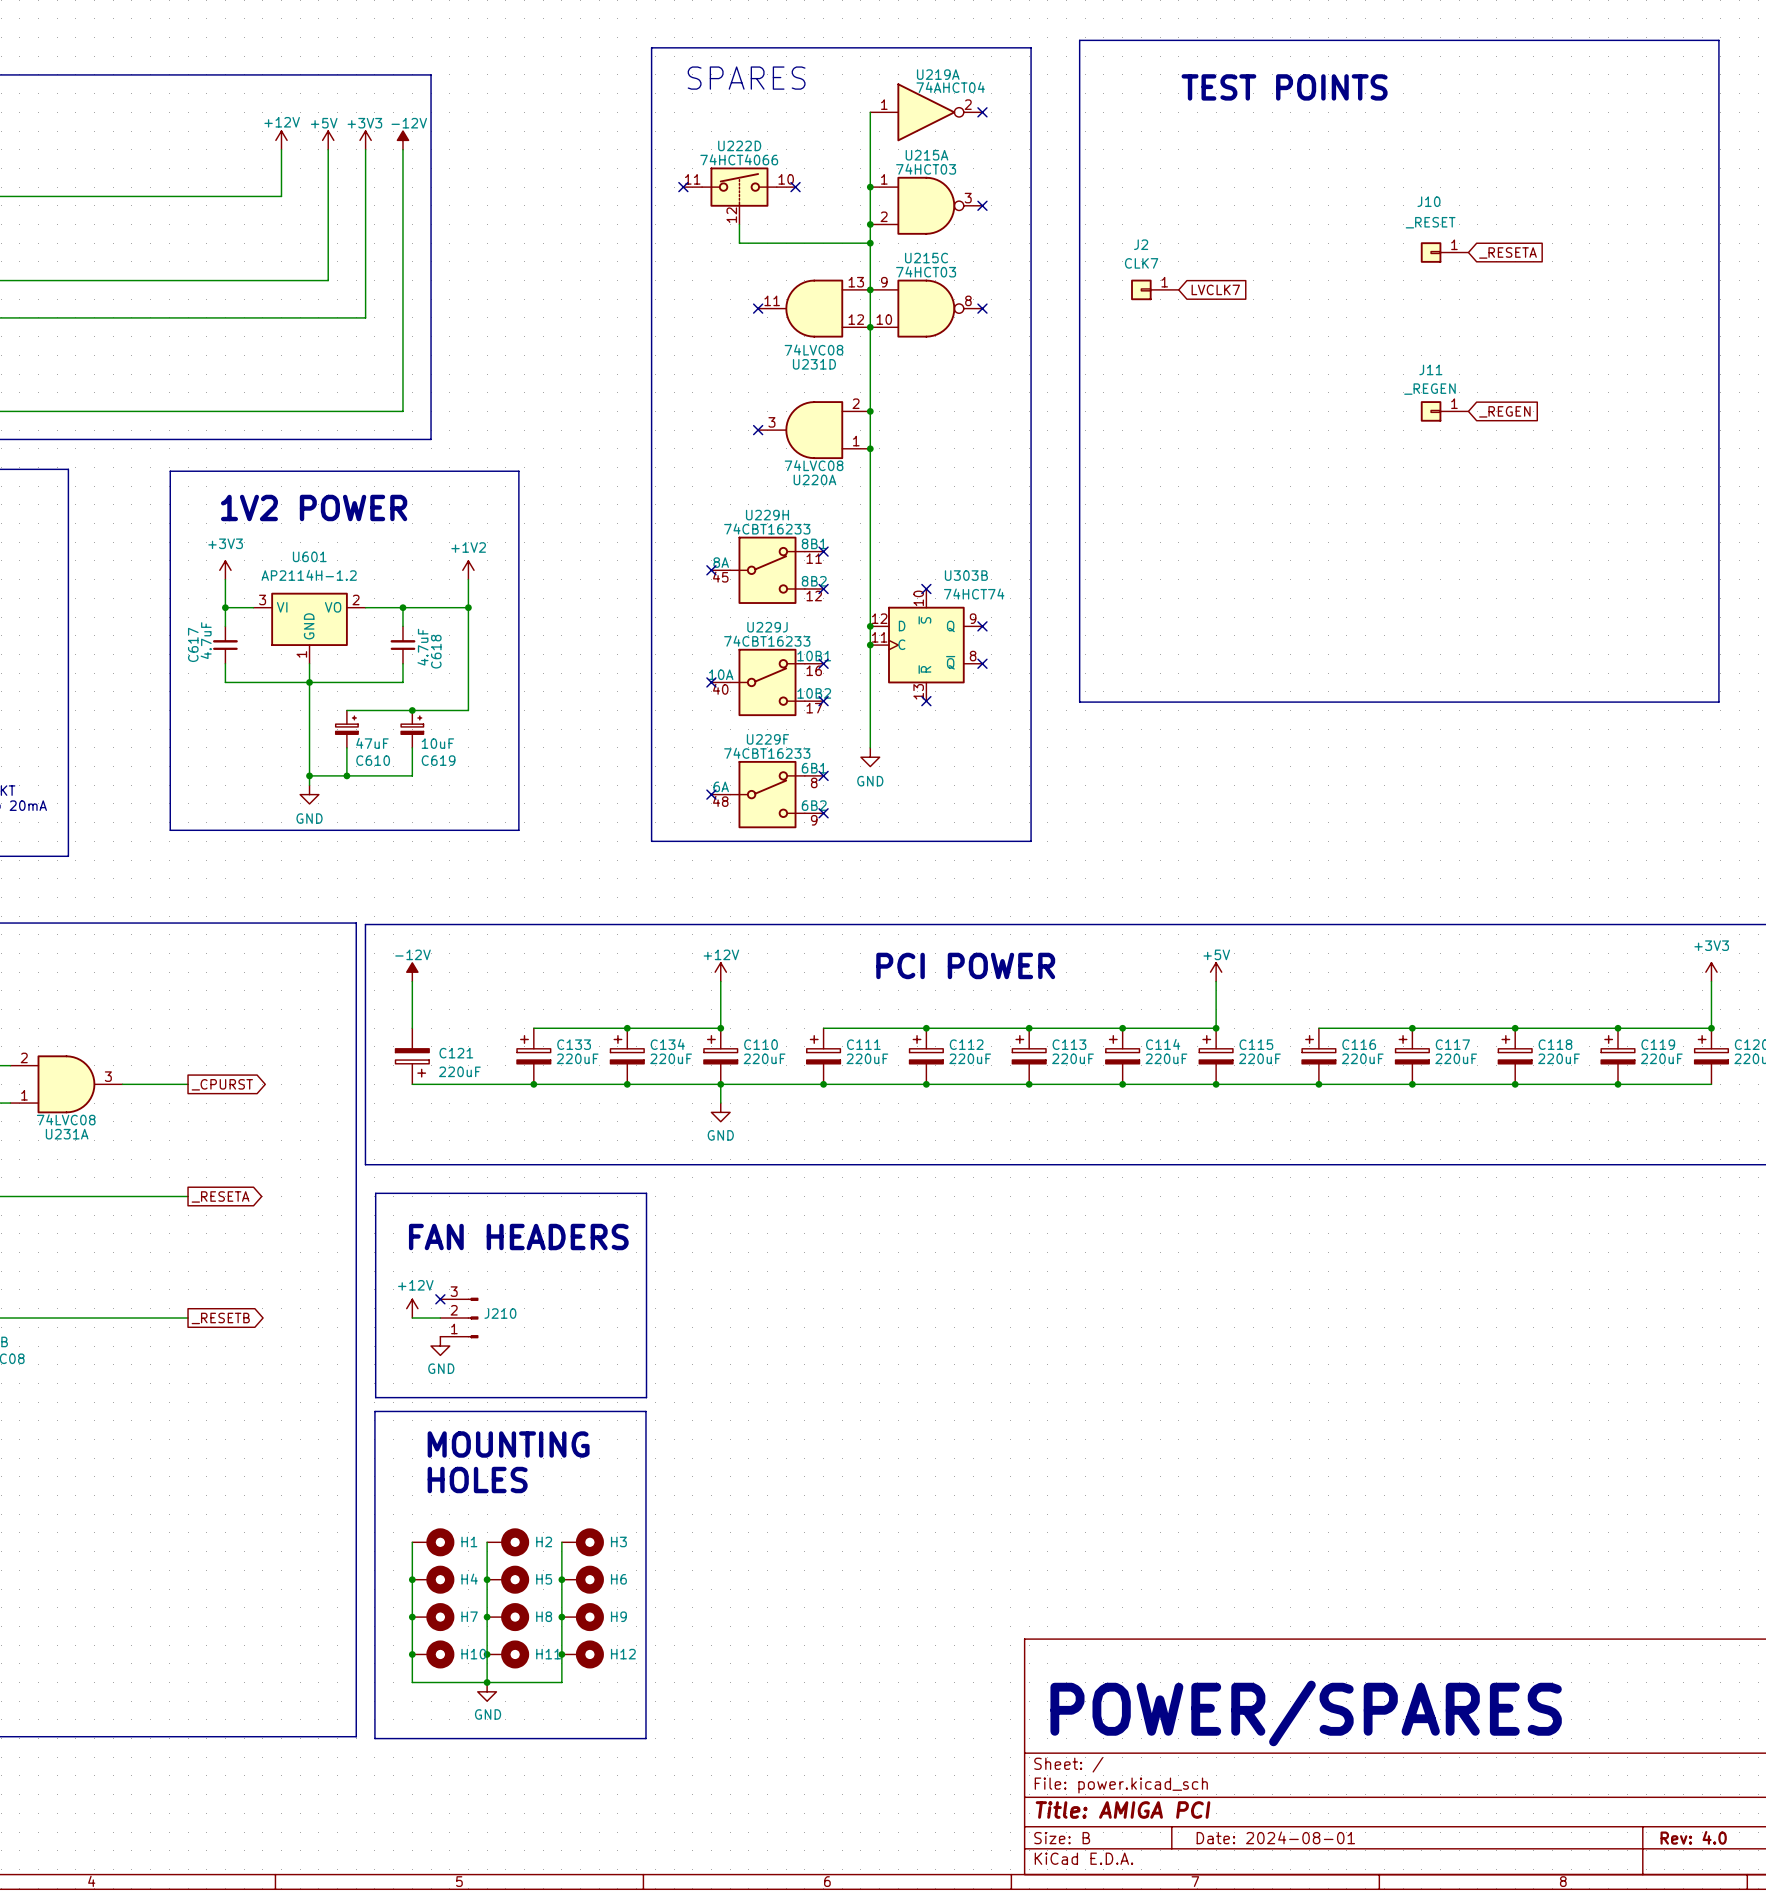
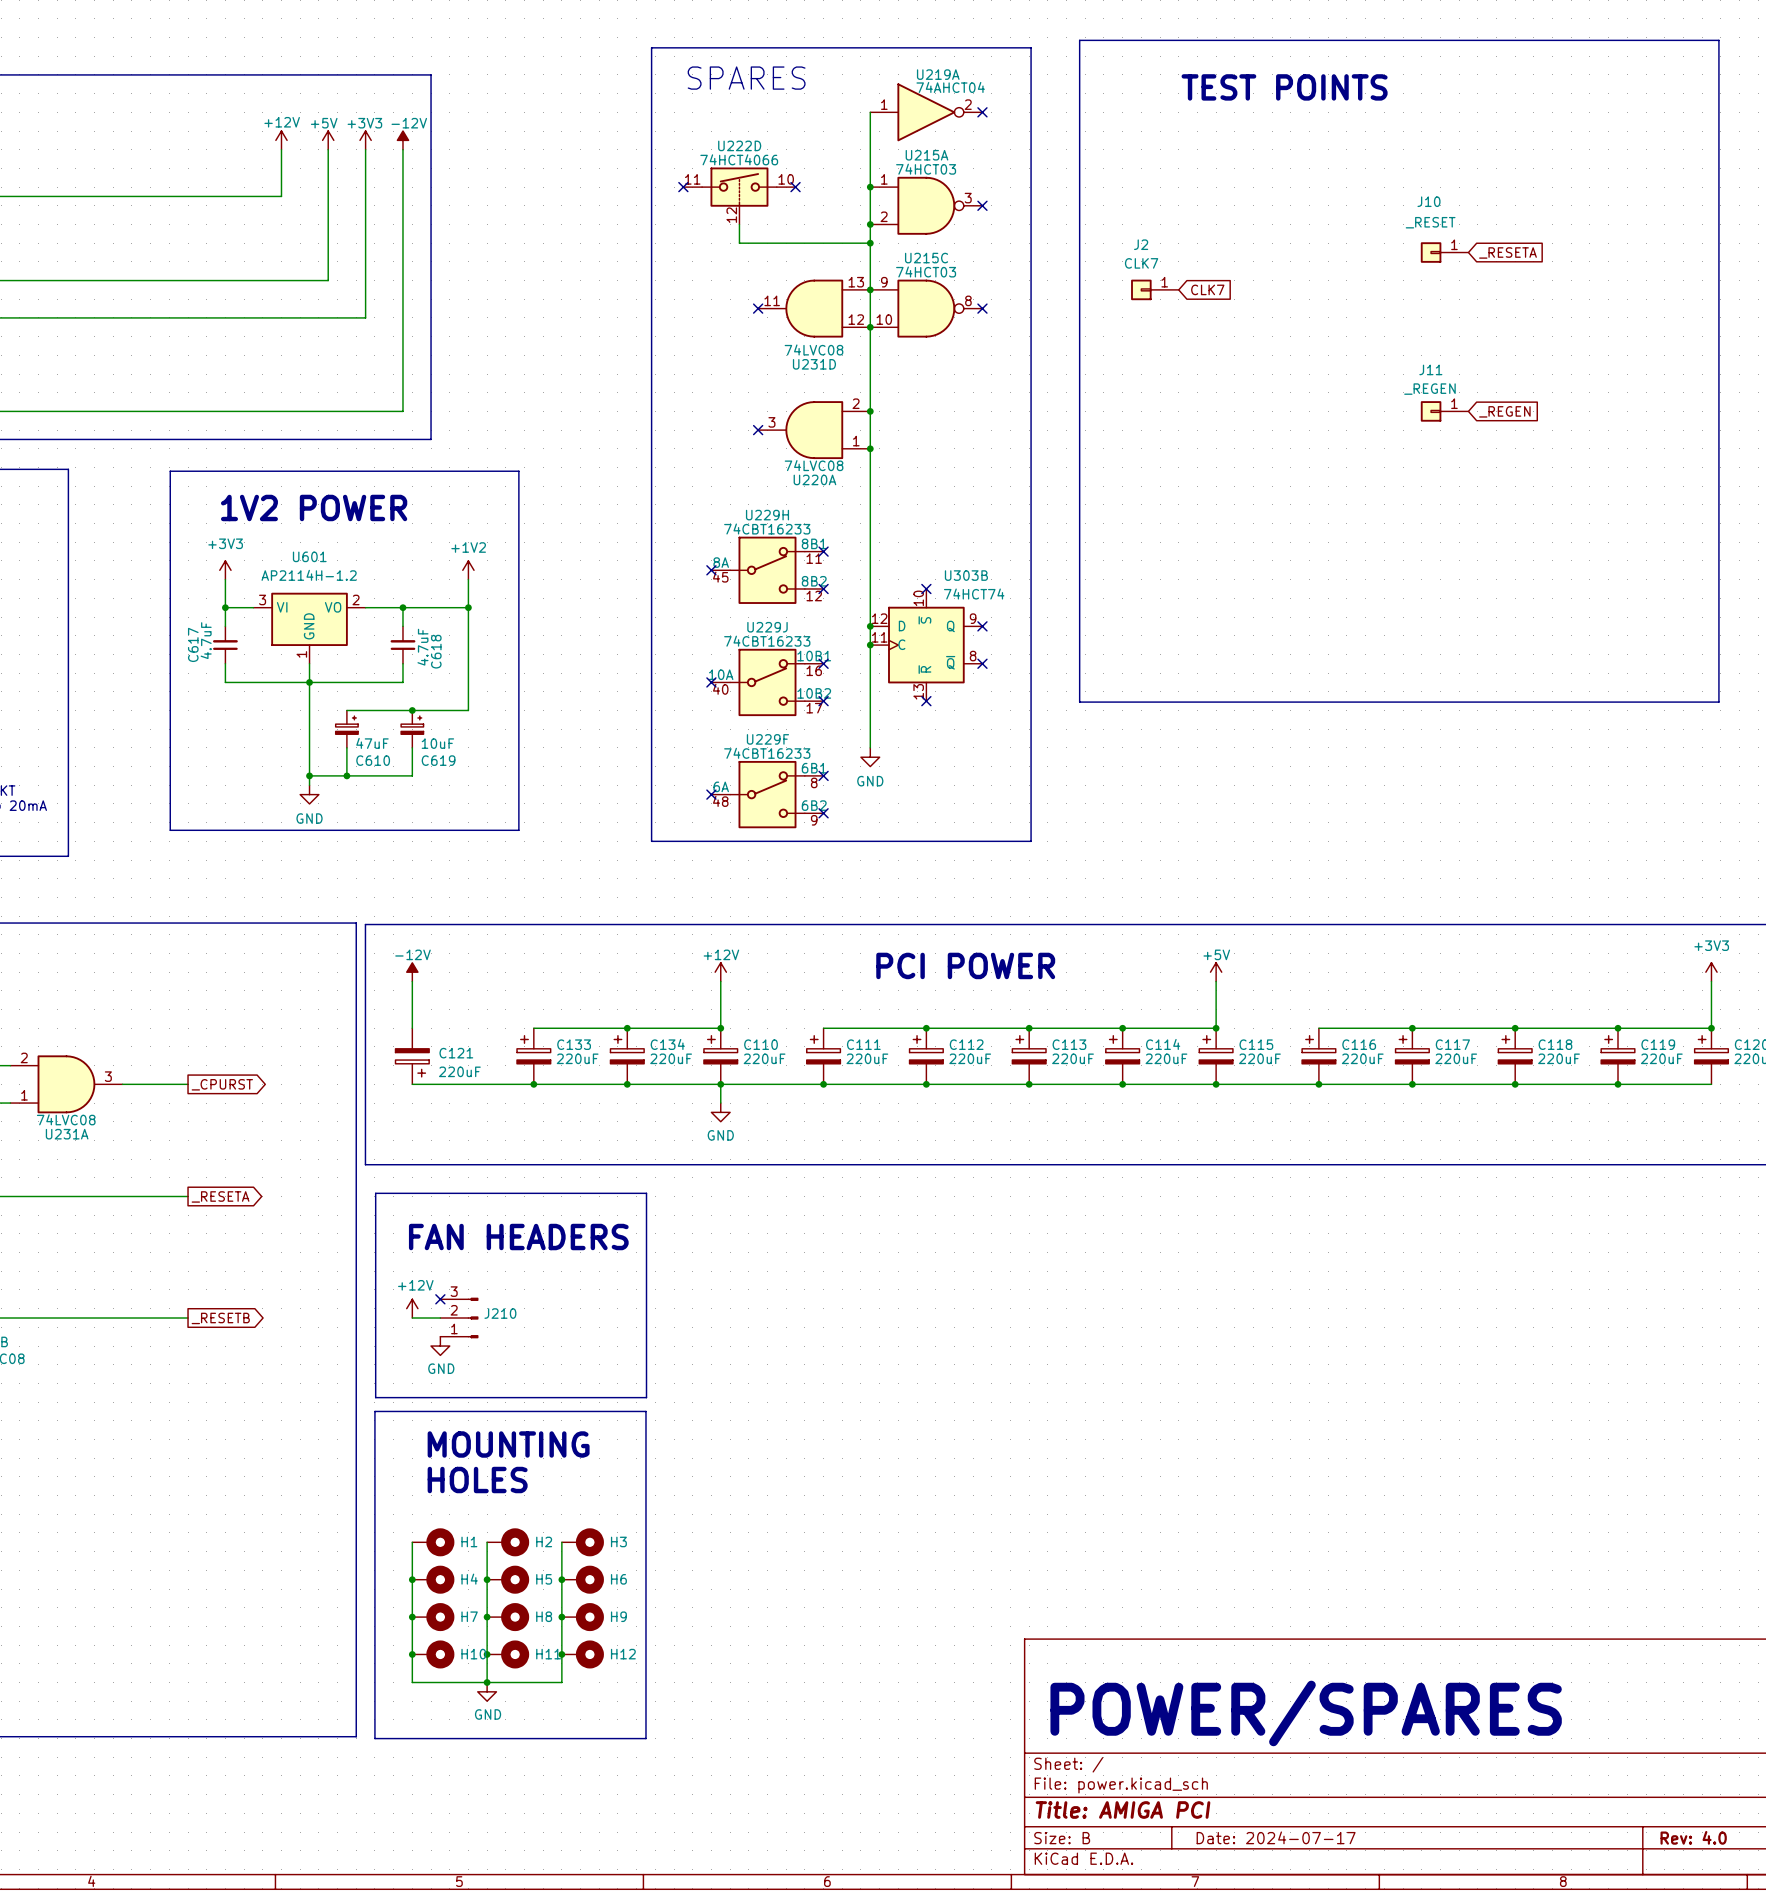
global label: LVCLK7 (1215, 289) -> CLK7 (1207, 289)
title block: Date: 2024-08-01 (1275, 1837) -> Date: 2024-07-17 (1276, 1837)

